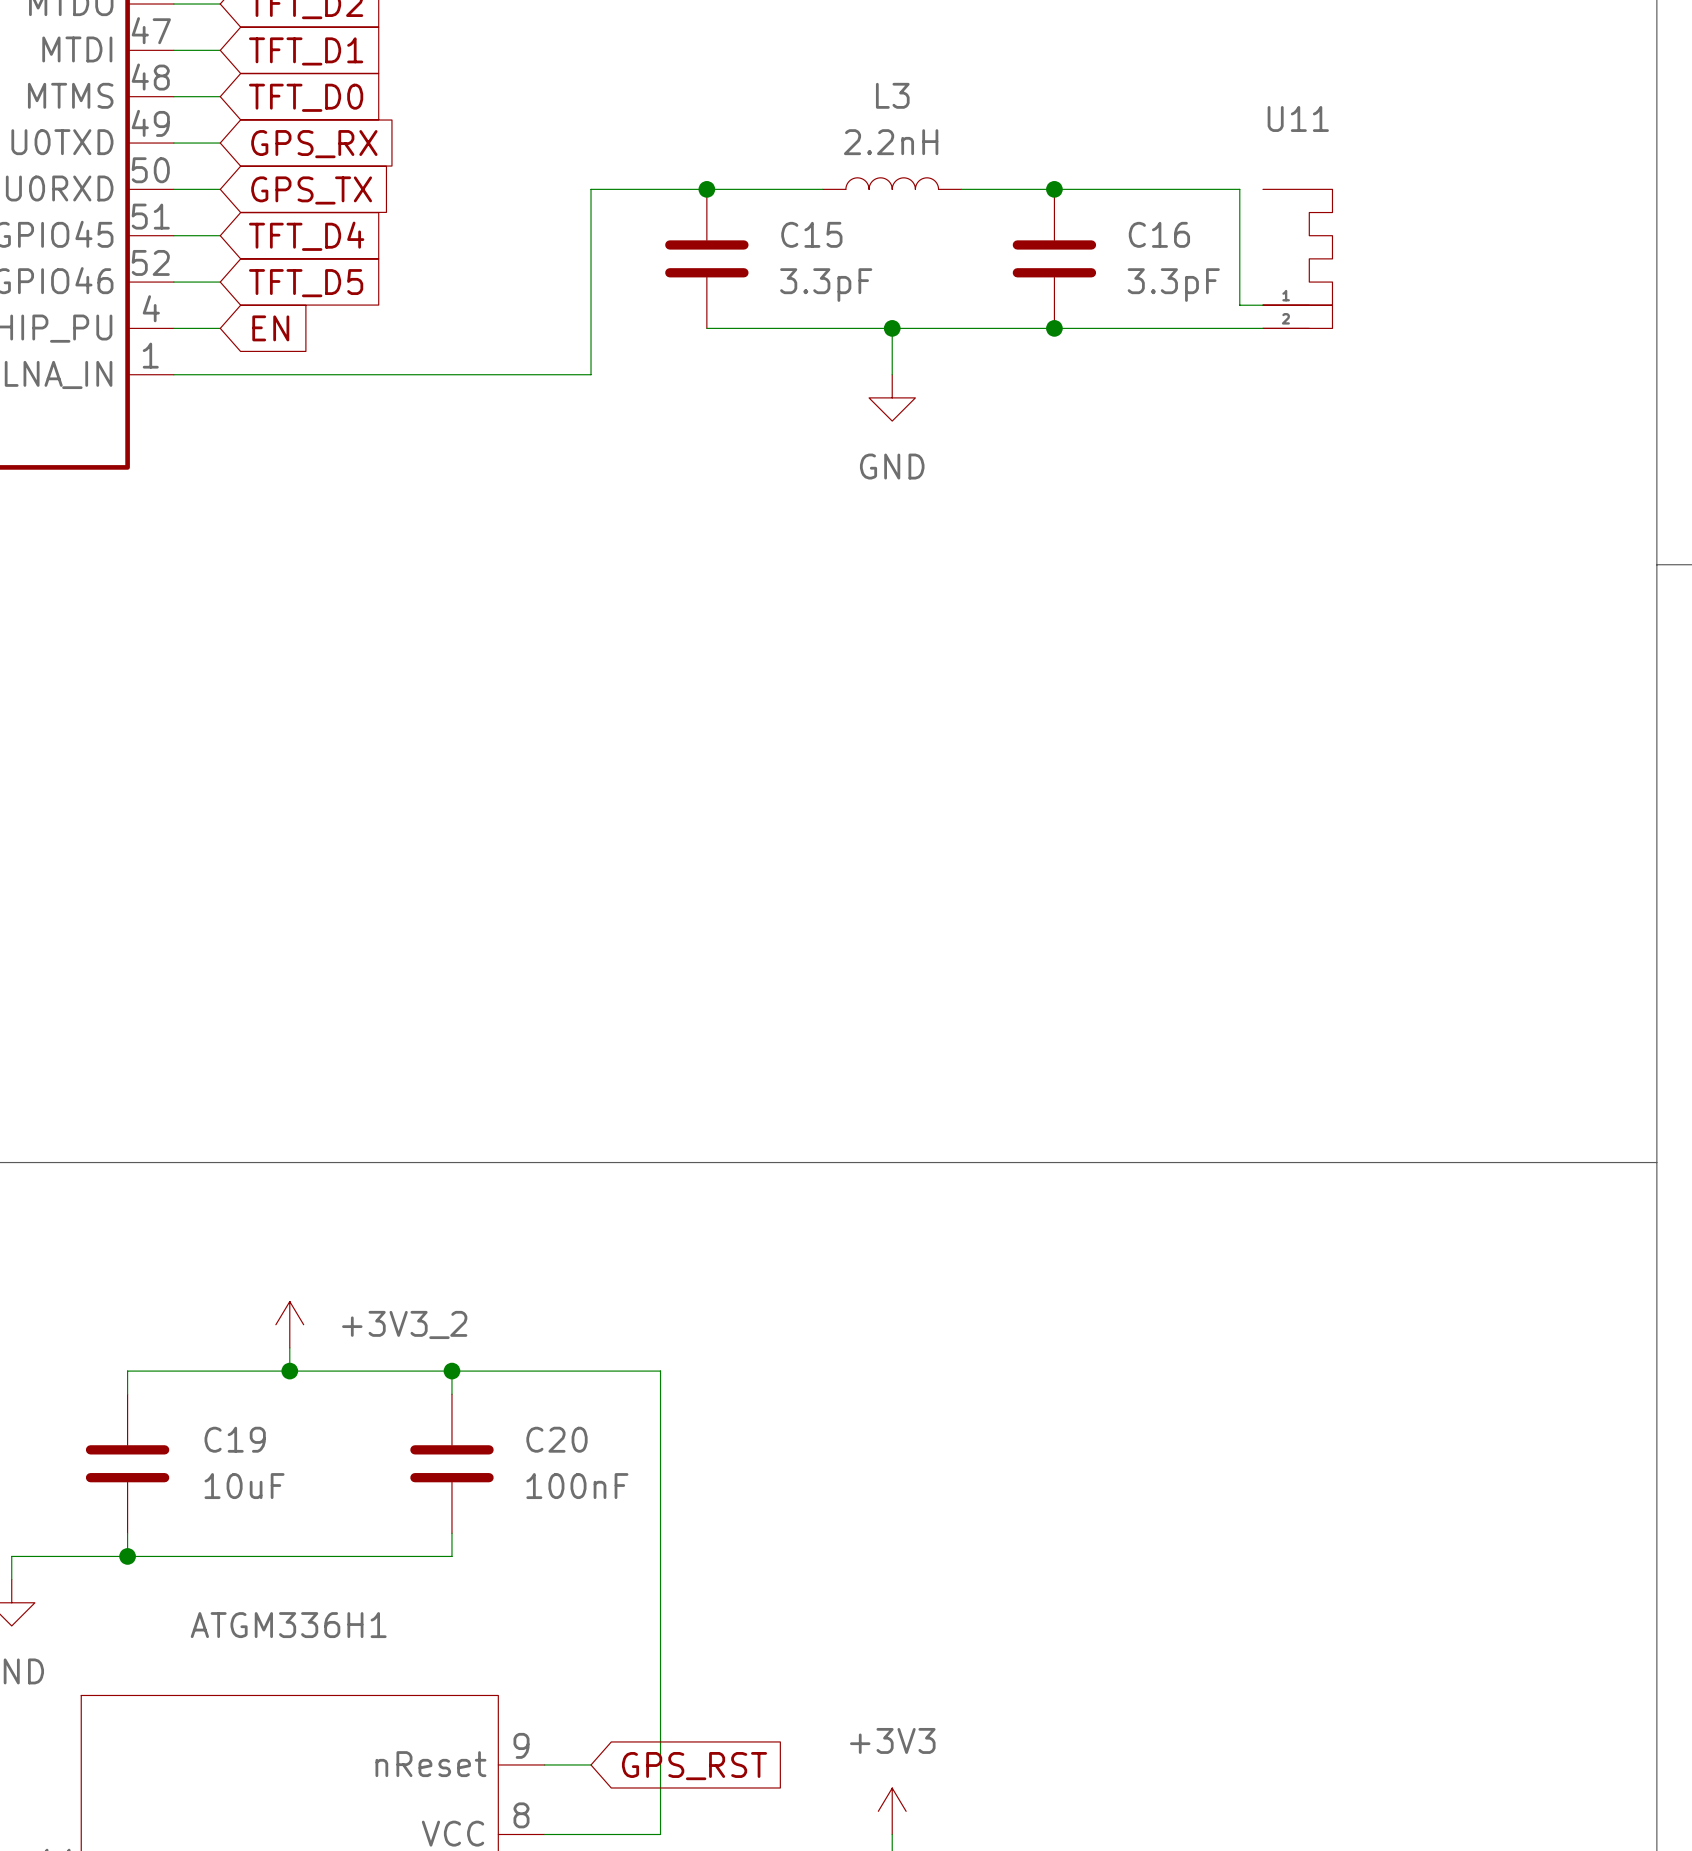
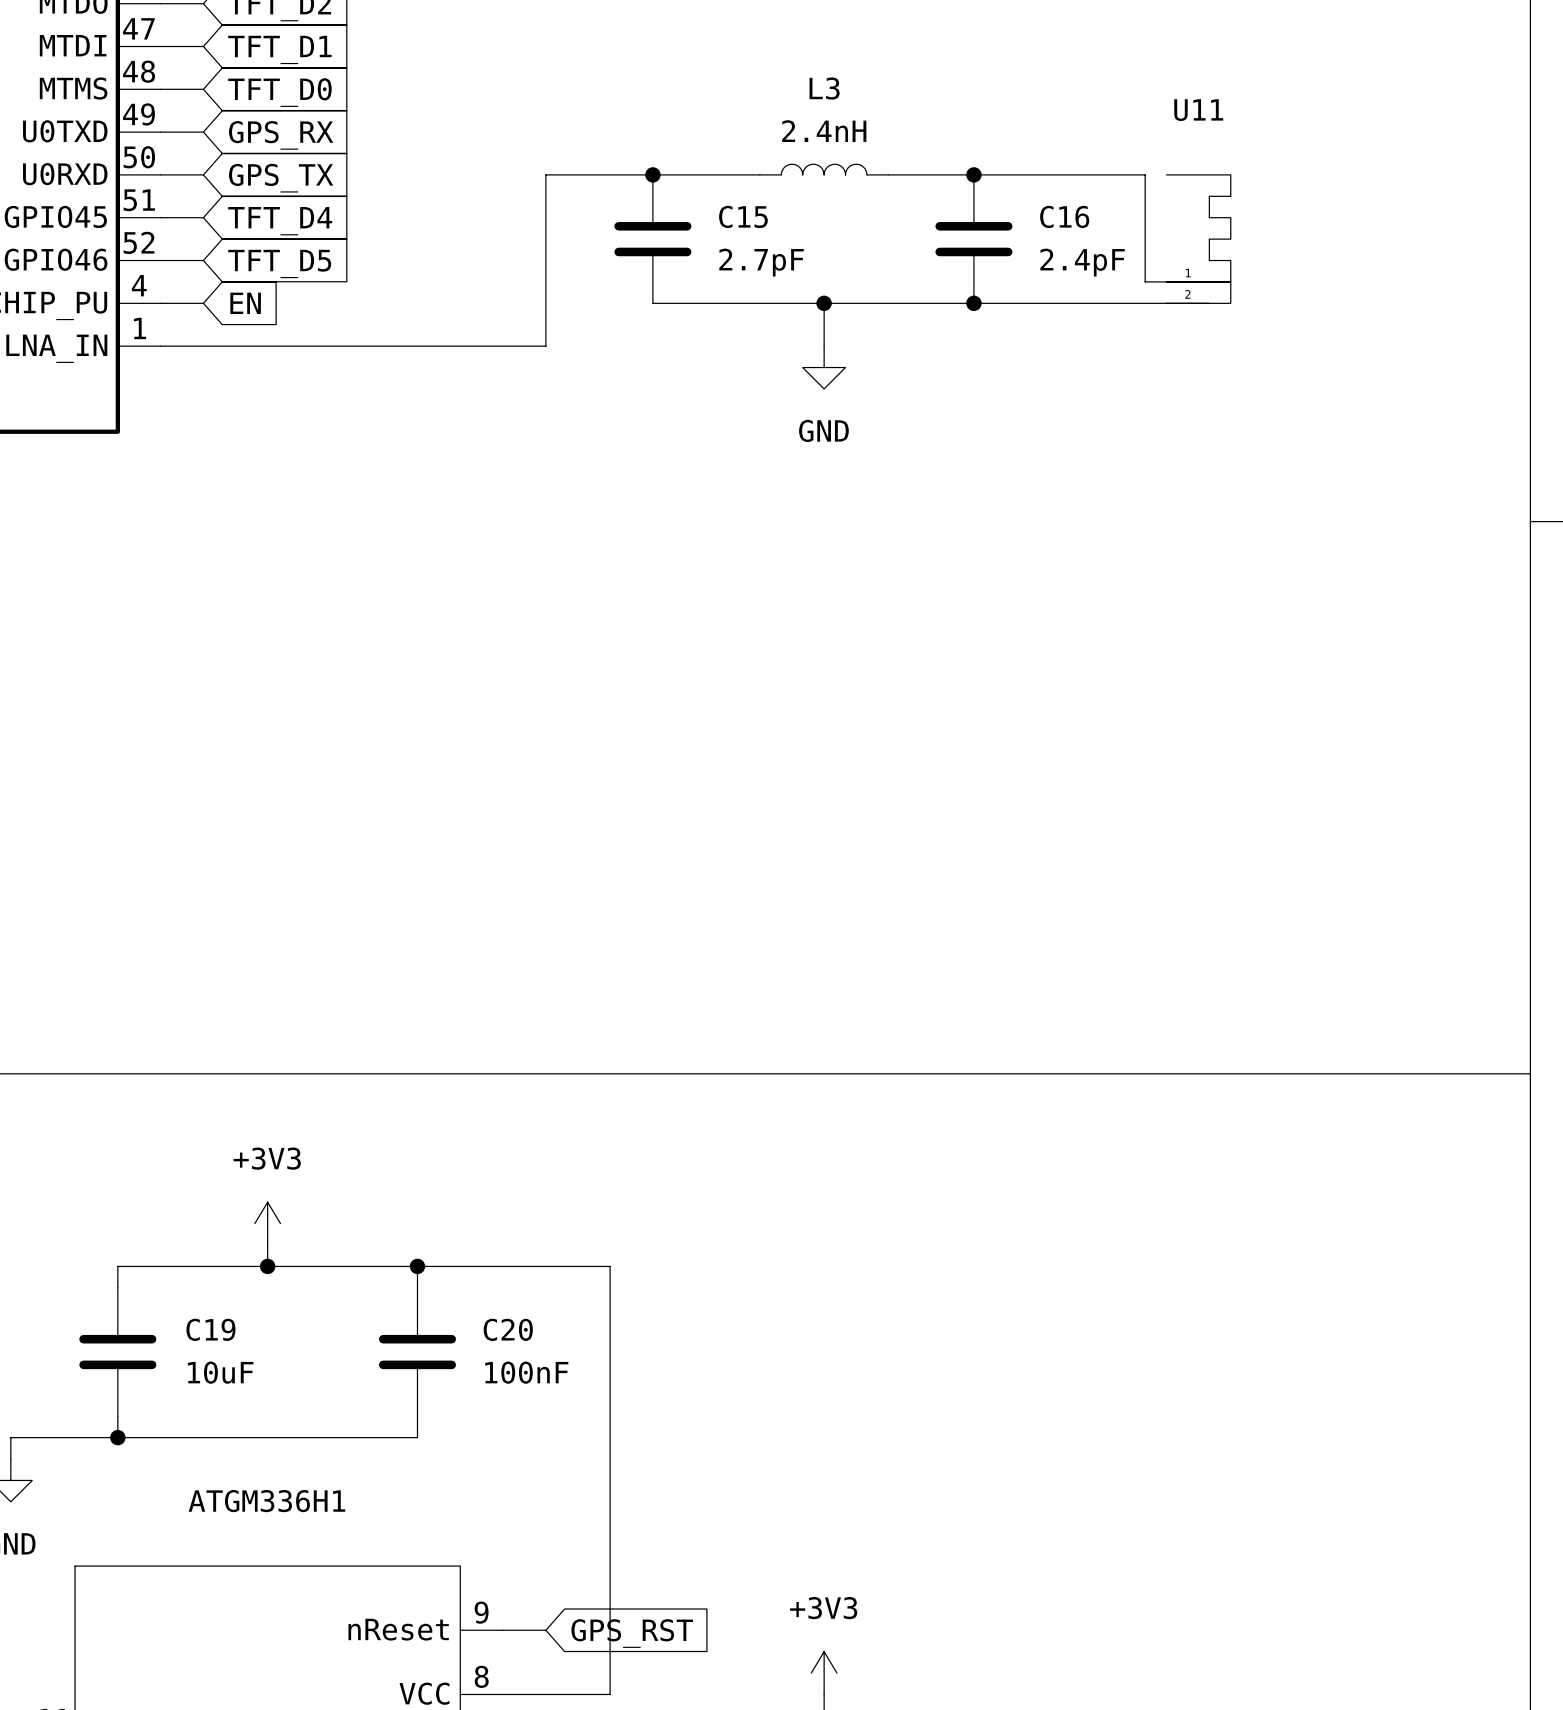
L3 value: 2.2nH (891, 142) -> 2.4nH (824, 131)
C15 value: 3.3pF (826, 285) -> 2.7pF (761, 262)
C16 value: 3.3pF (1173, 285) -> 2.4pF (1082, 262)
power symbol: +3V3_2 (289, 1324) -> +3V3 (267, 1223)

